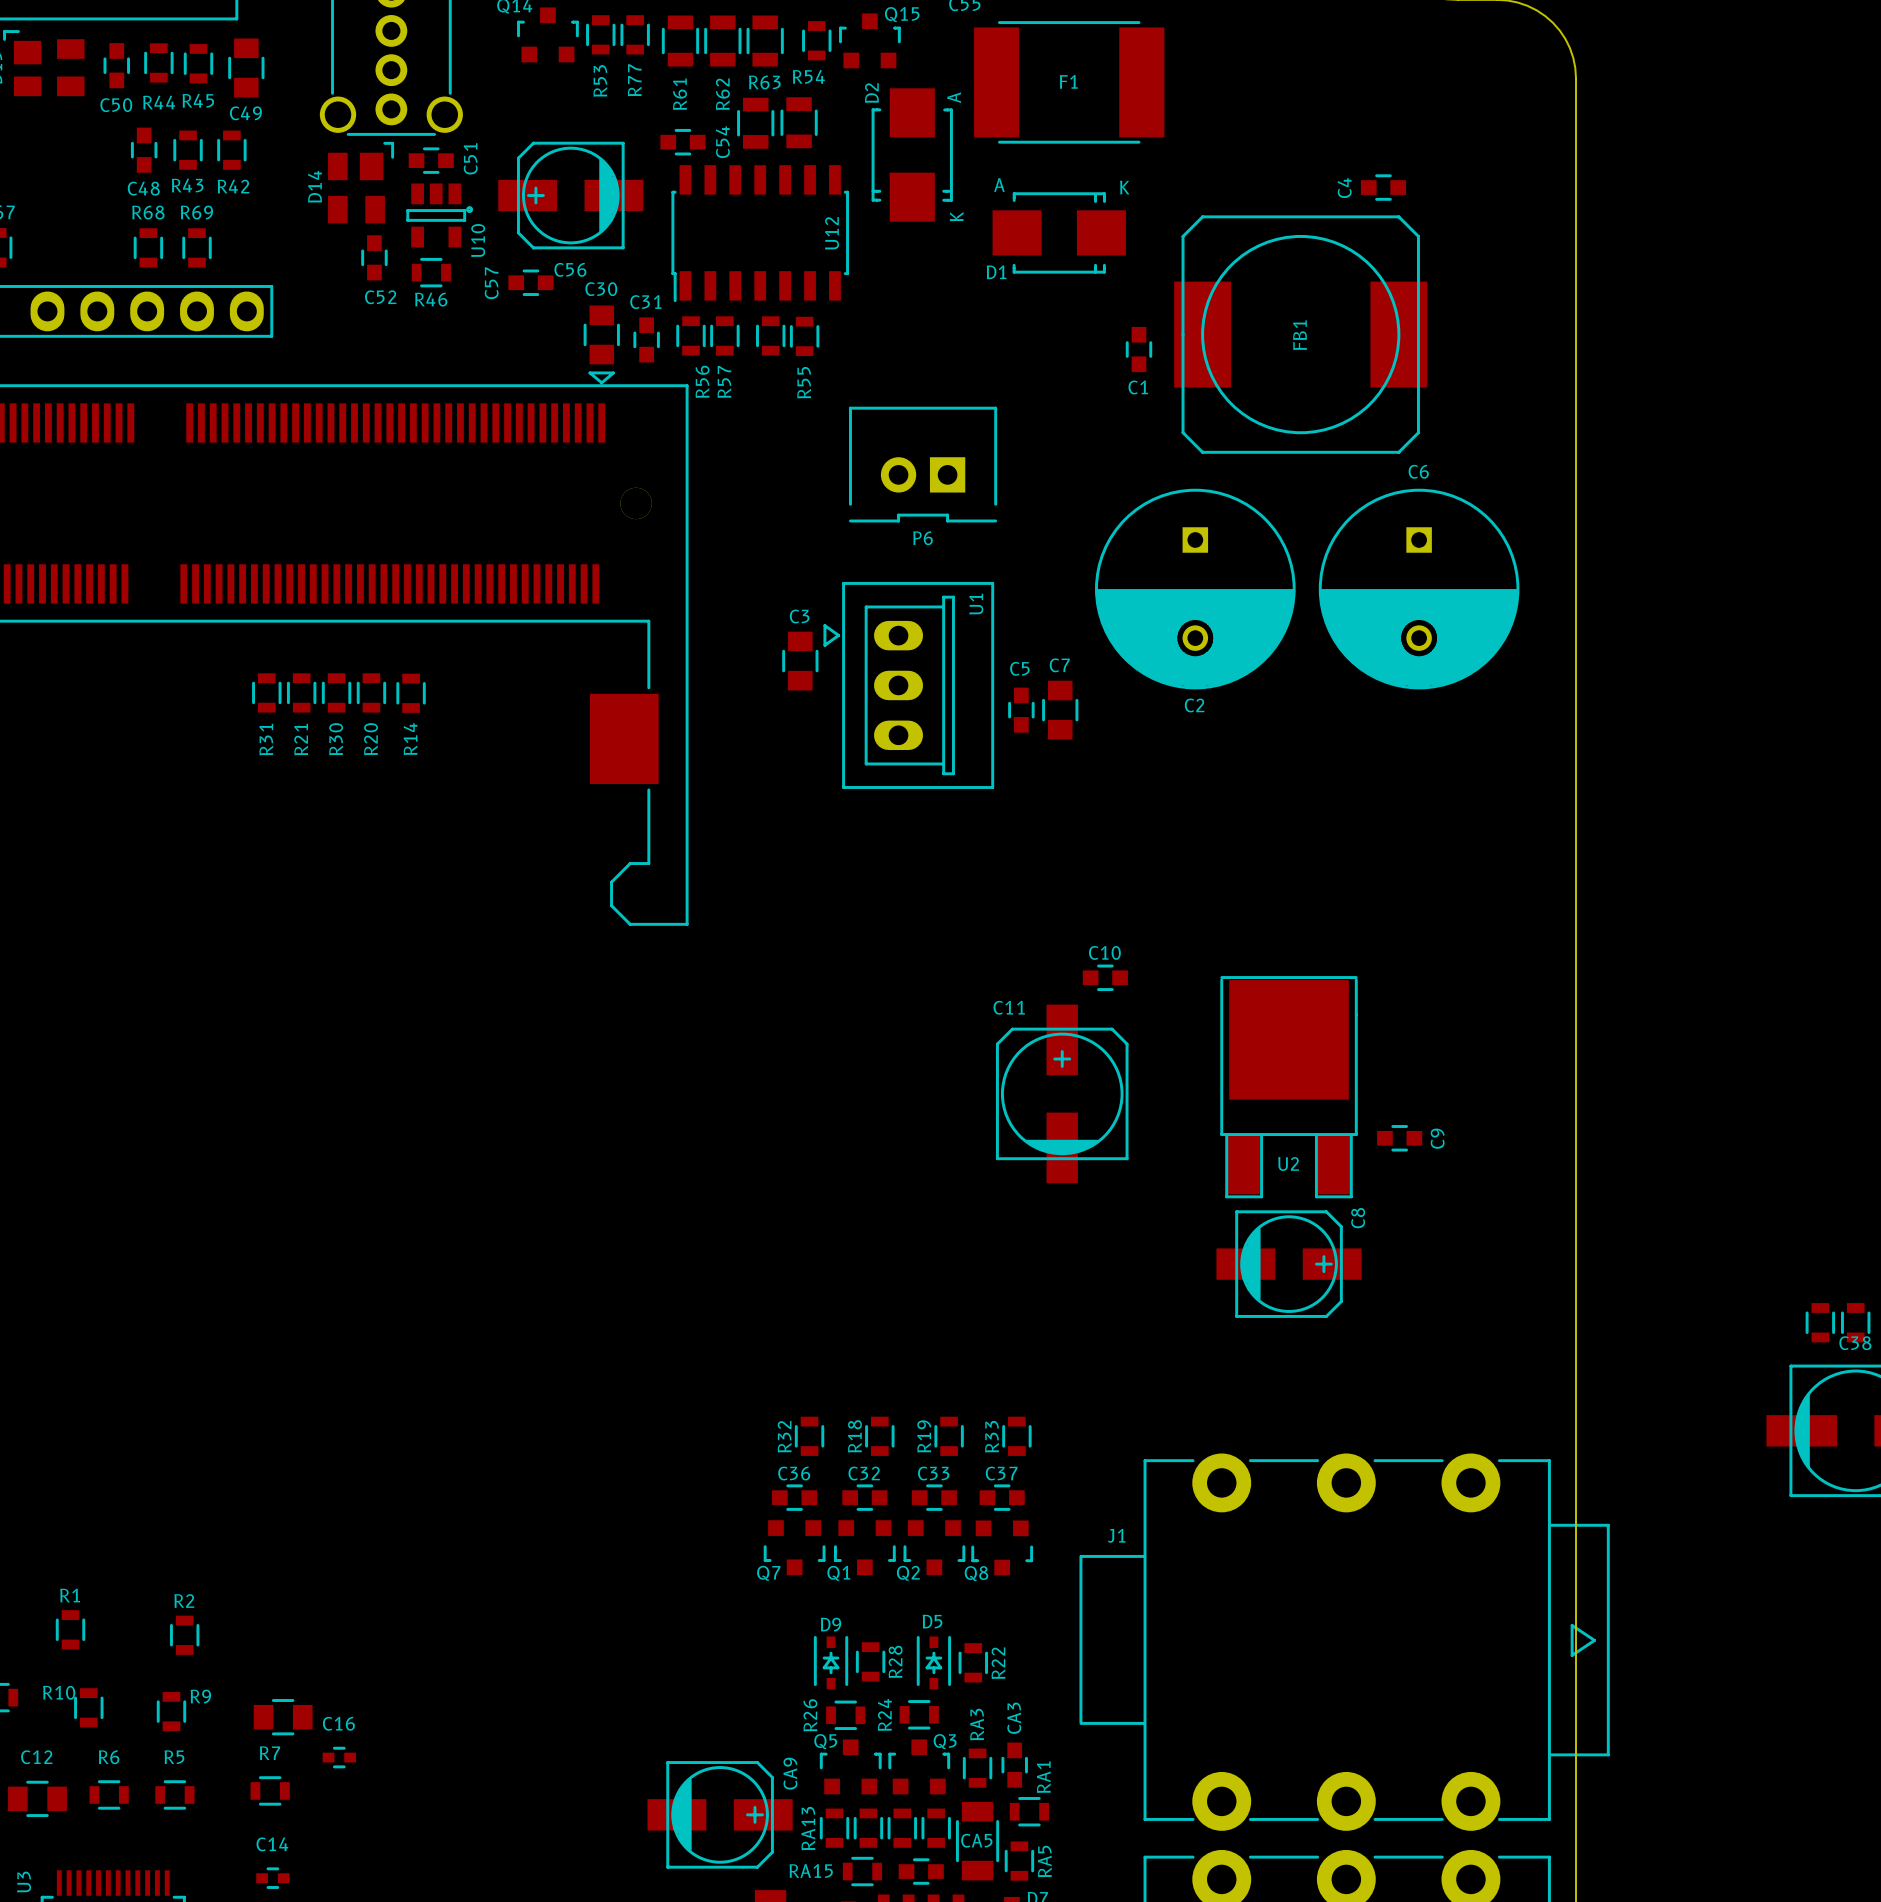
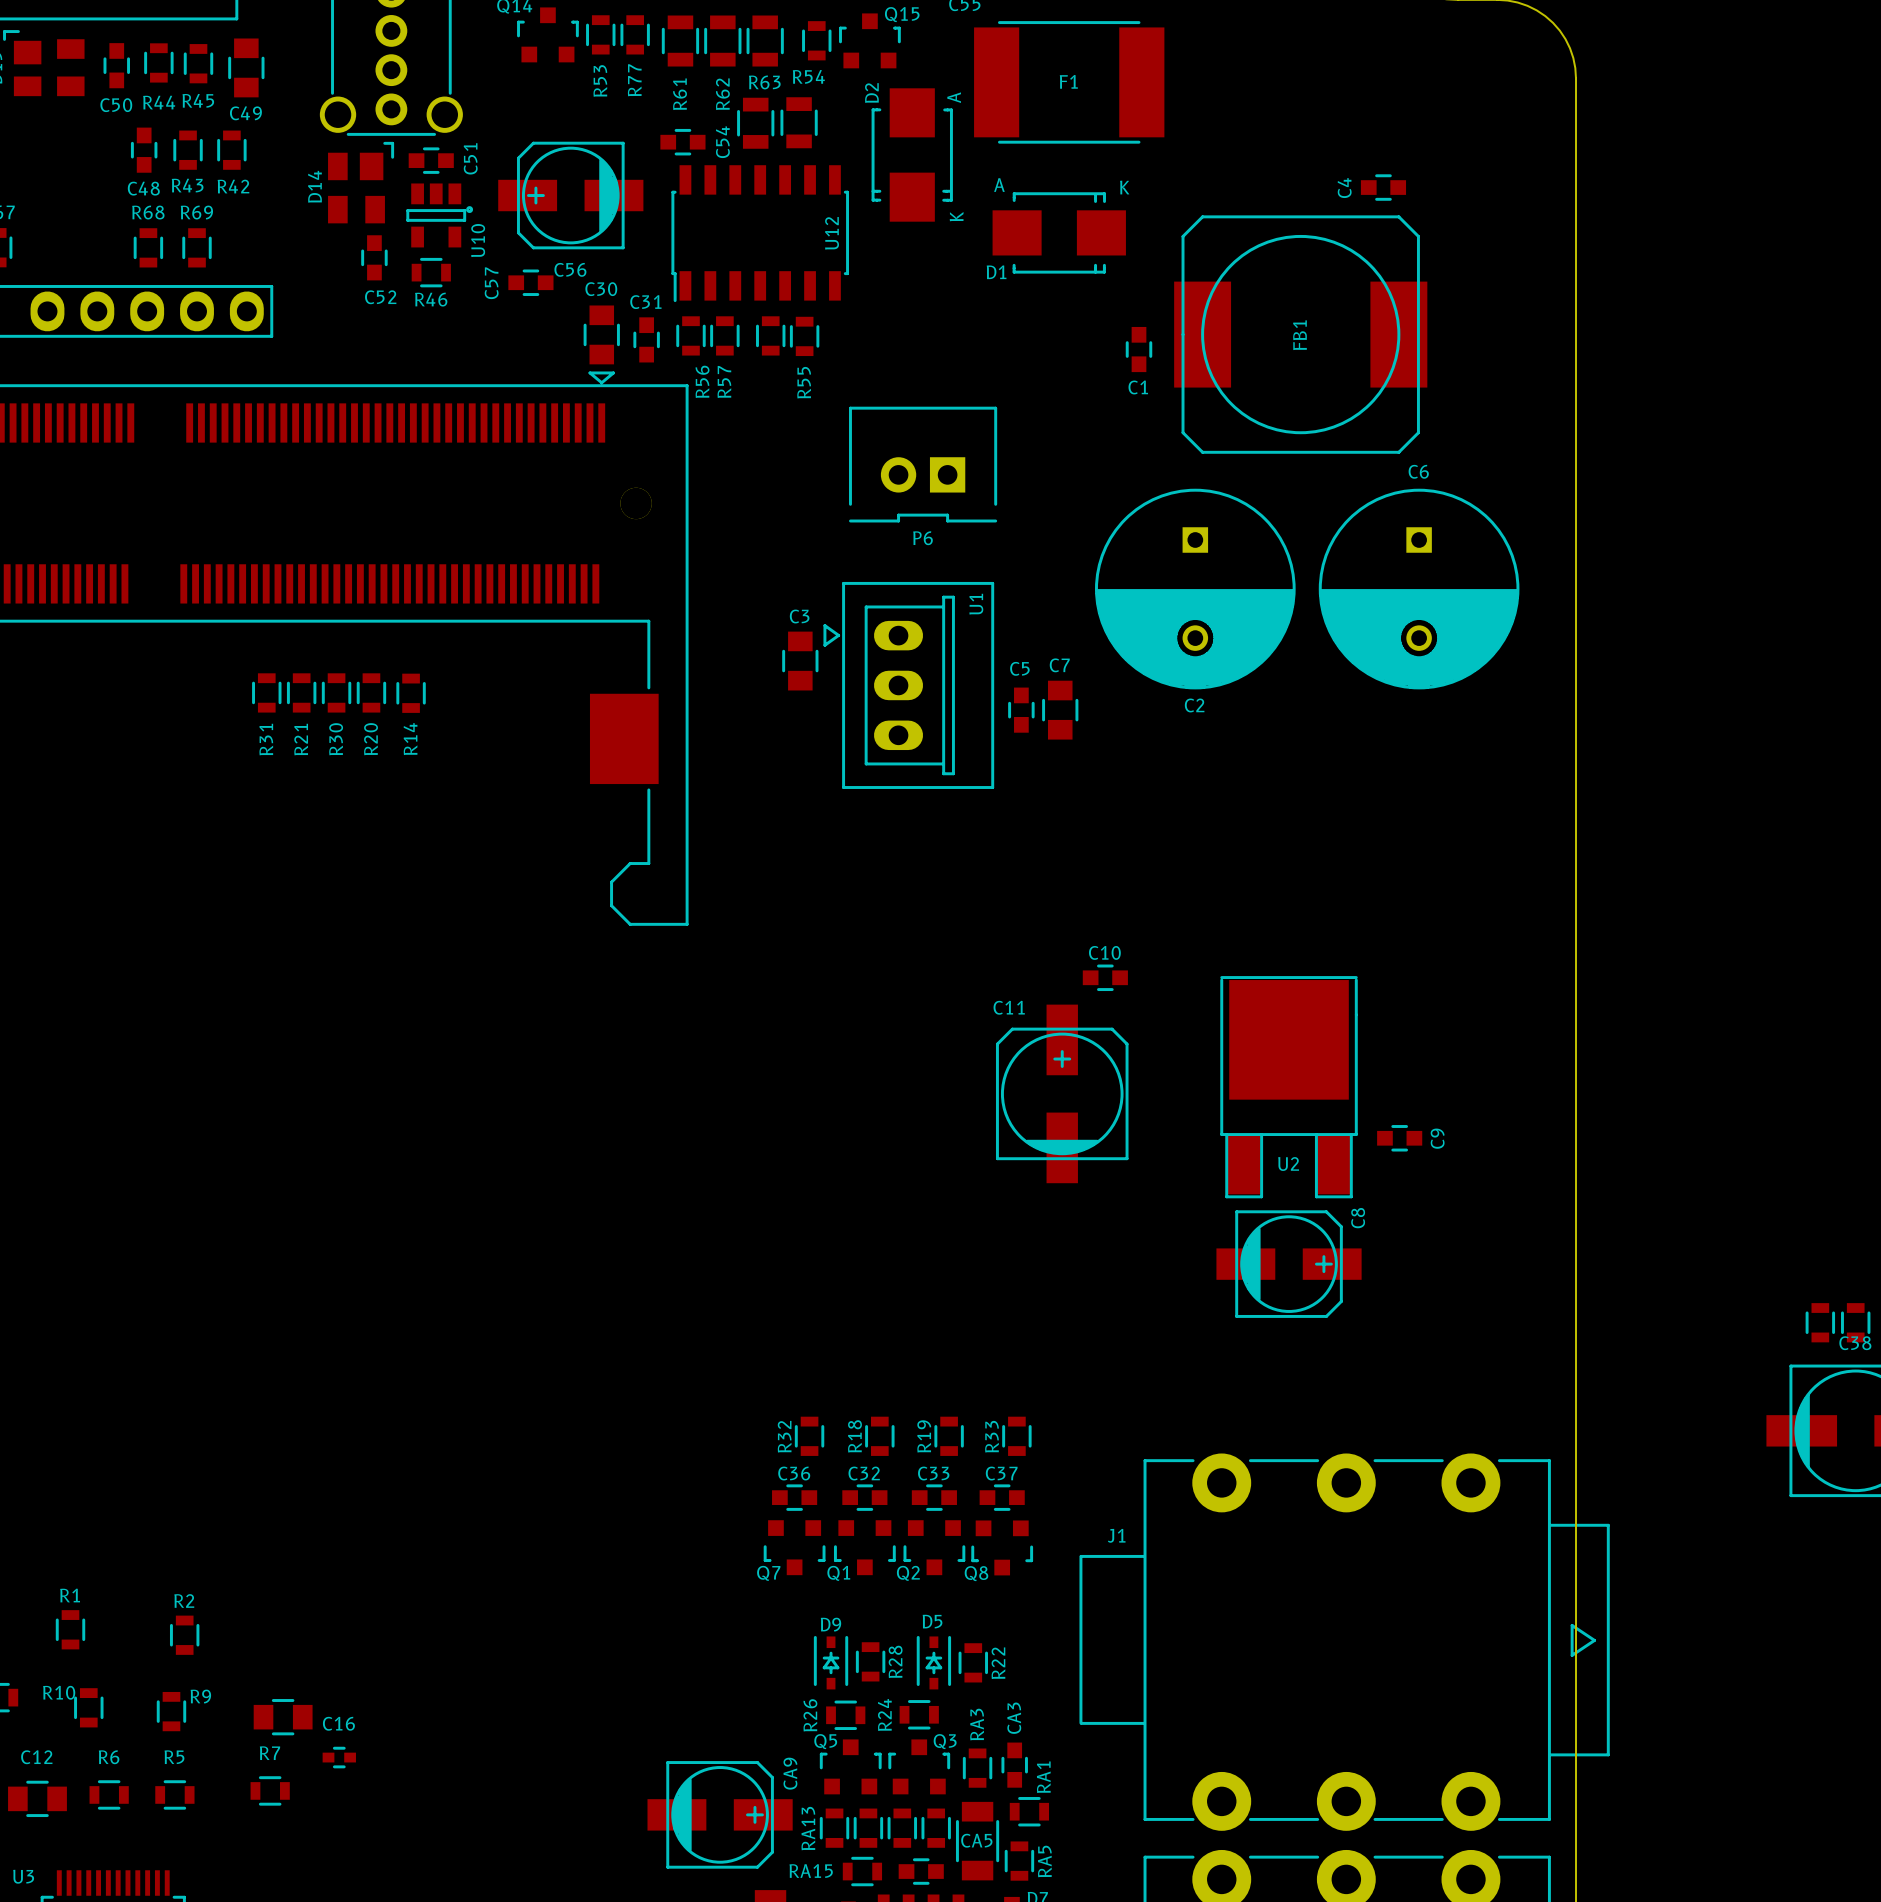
C14: (272, 1878) -> none
U3 name rotation: 0° (24, 1882) -> 90° clockwise (23, 1876)

